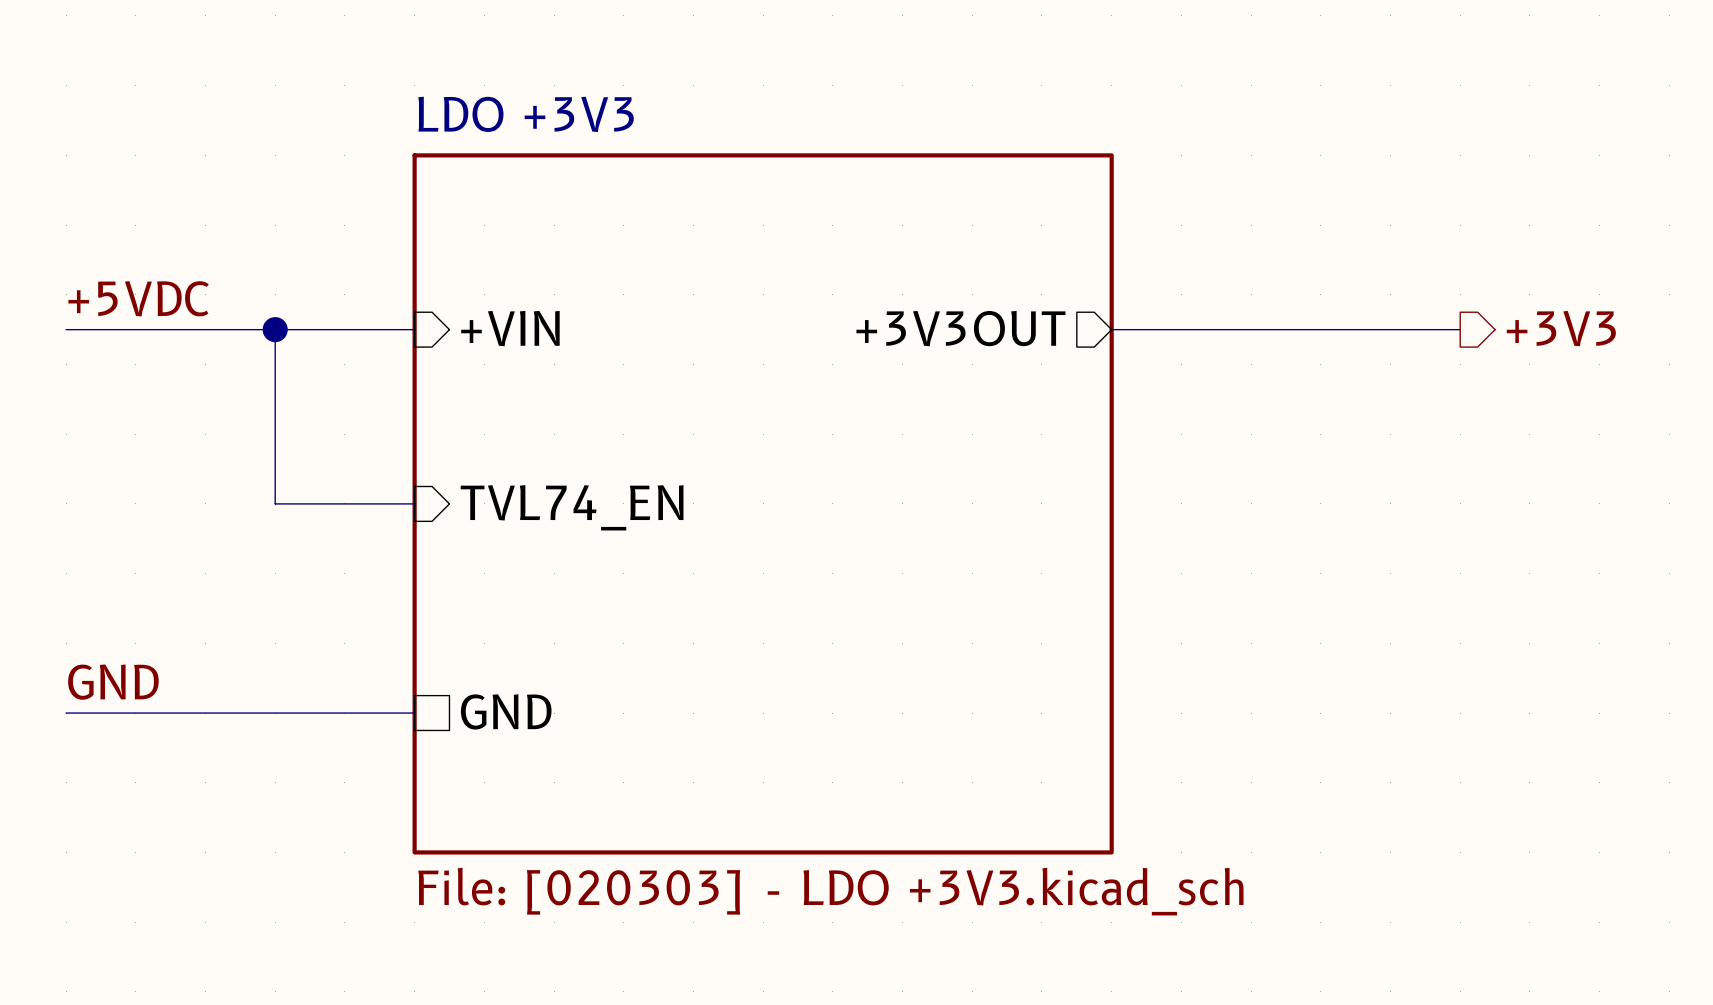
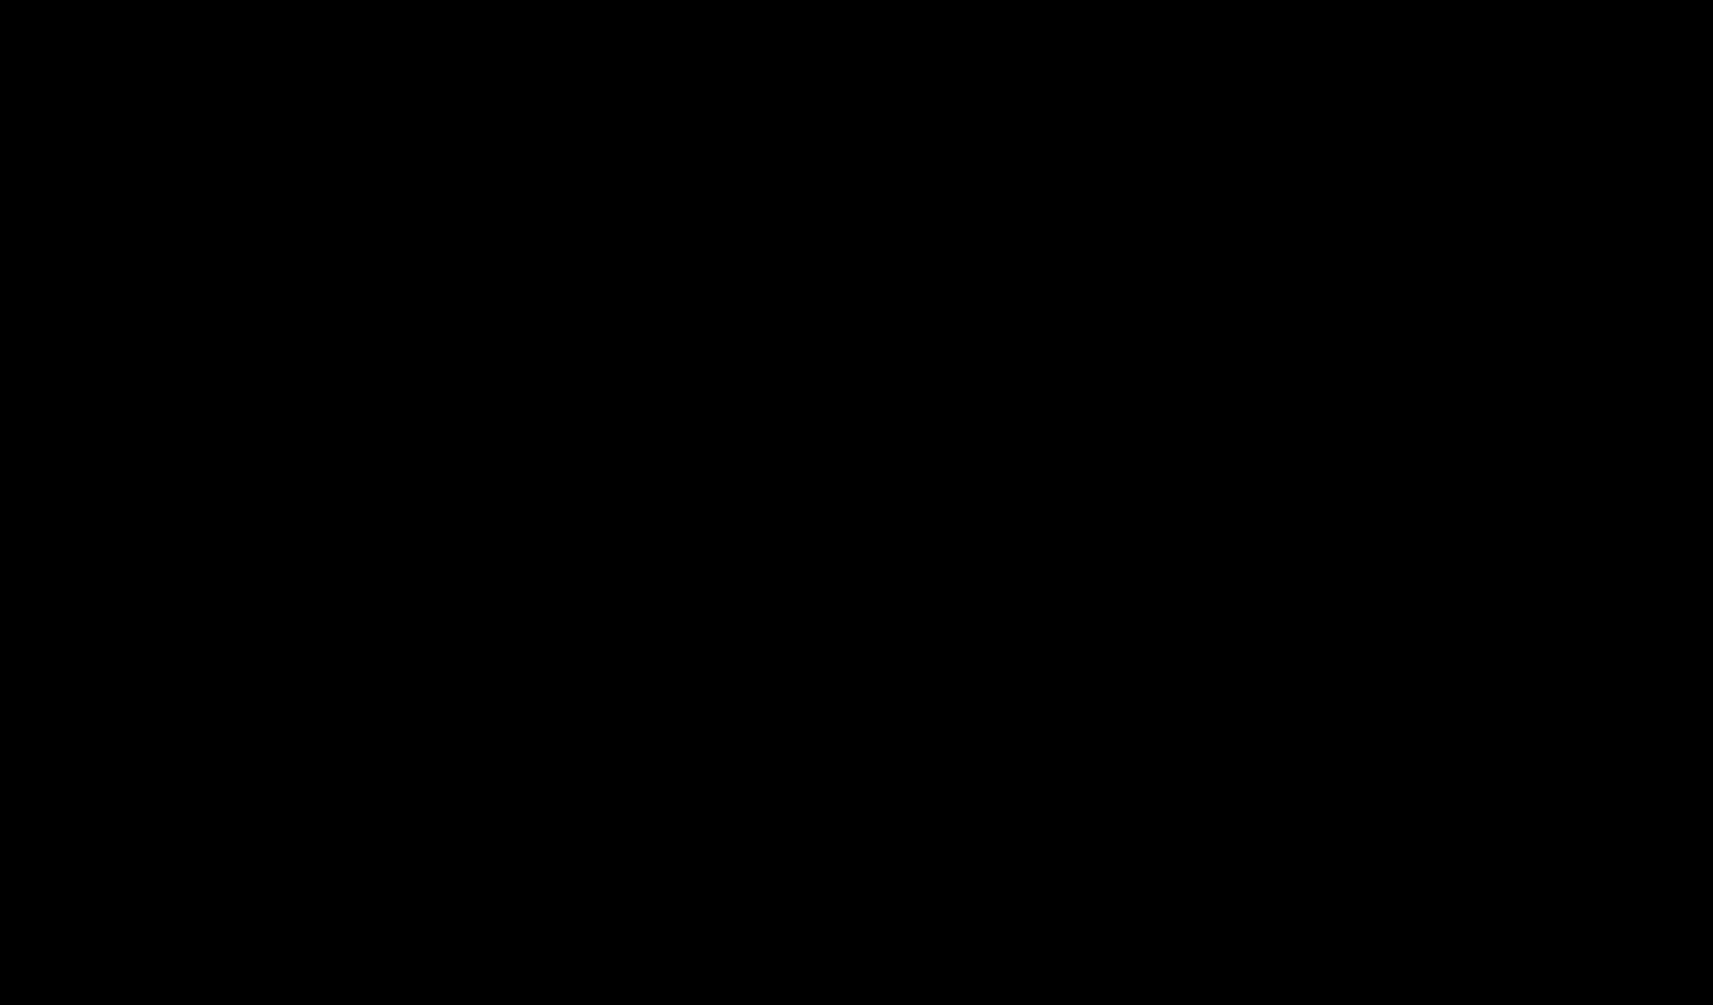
label: +5VDC (138, 298) -> none
sheet pin: +VIN (510, 328) -> none
sheet pin: +3V3OUT (960, 328) -> none
hierarchical label: +3V3 (1561, 328) -> none
wire: (66, 329) (414, 329) -> none
wire: (275, 329) (275, 503) (414, 503) -> none
junction: (275, 329) -> none
wire: (1111, 329) (1460, 329) -> none
sheet LDO +3V3: File: [020303] - LDO +3V3.kicad_sch (763, 503) -> none
sheet pin: TVL74_EN (572, 507) -> none
label: GND (113, 682) -> none
sheet pin: GND (506, 711) -> none
wire: (66, 713) (414, 713) -> none

